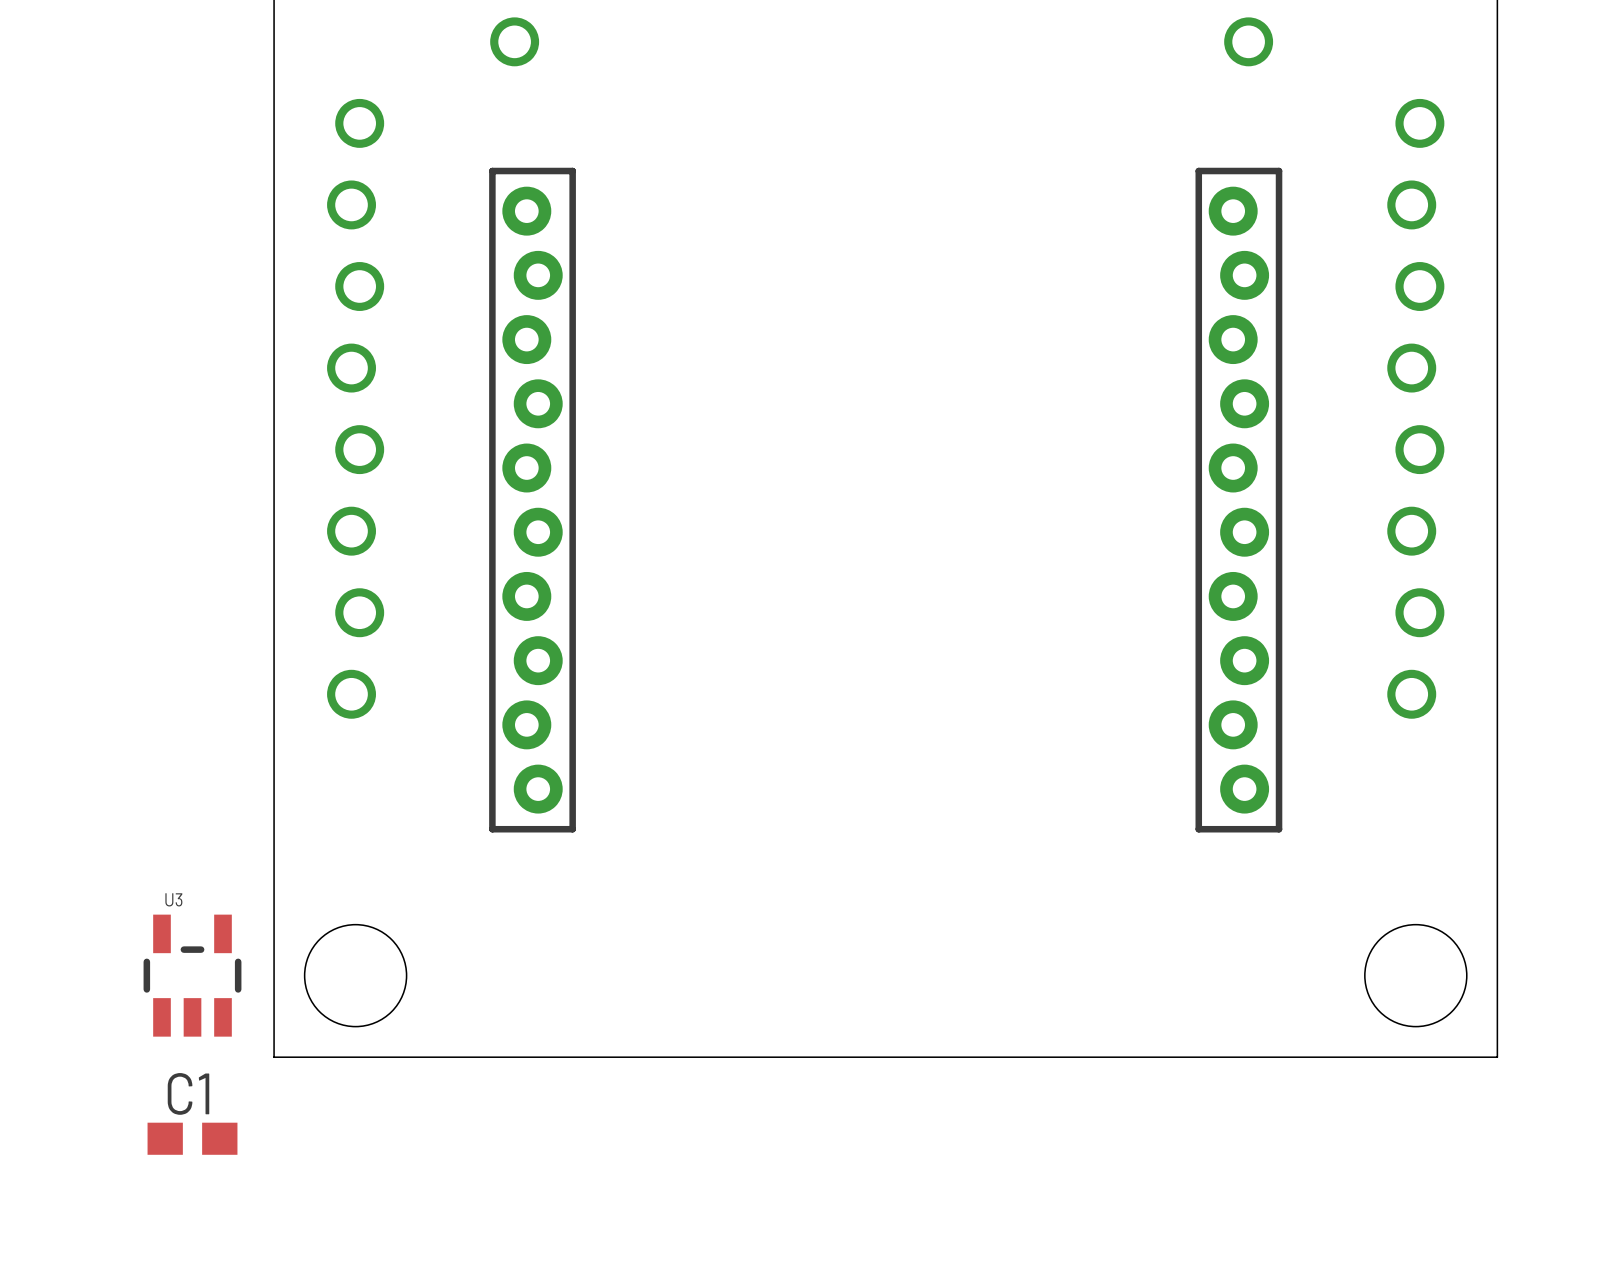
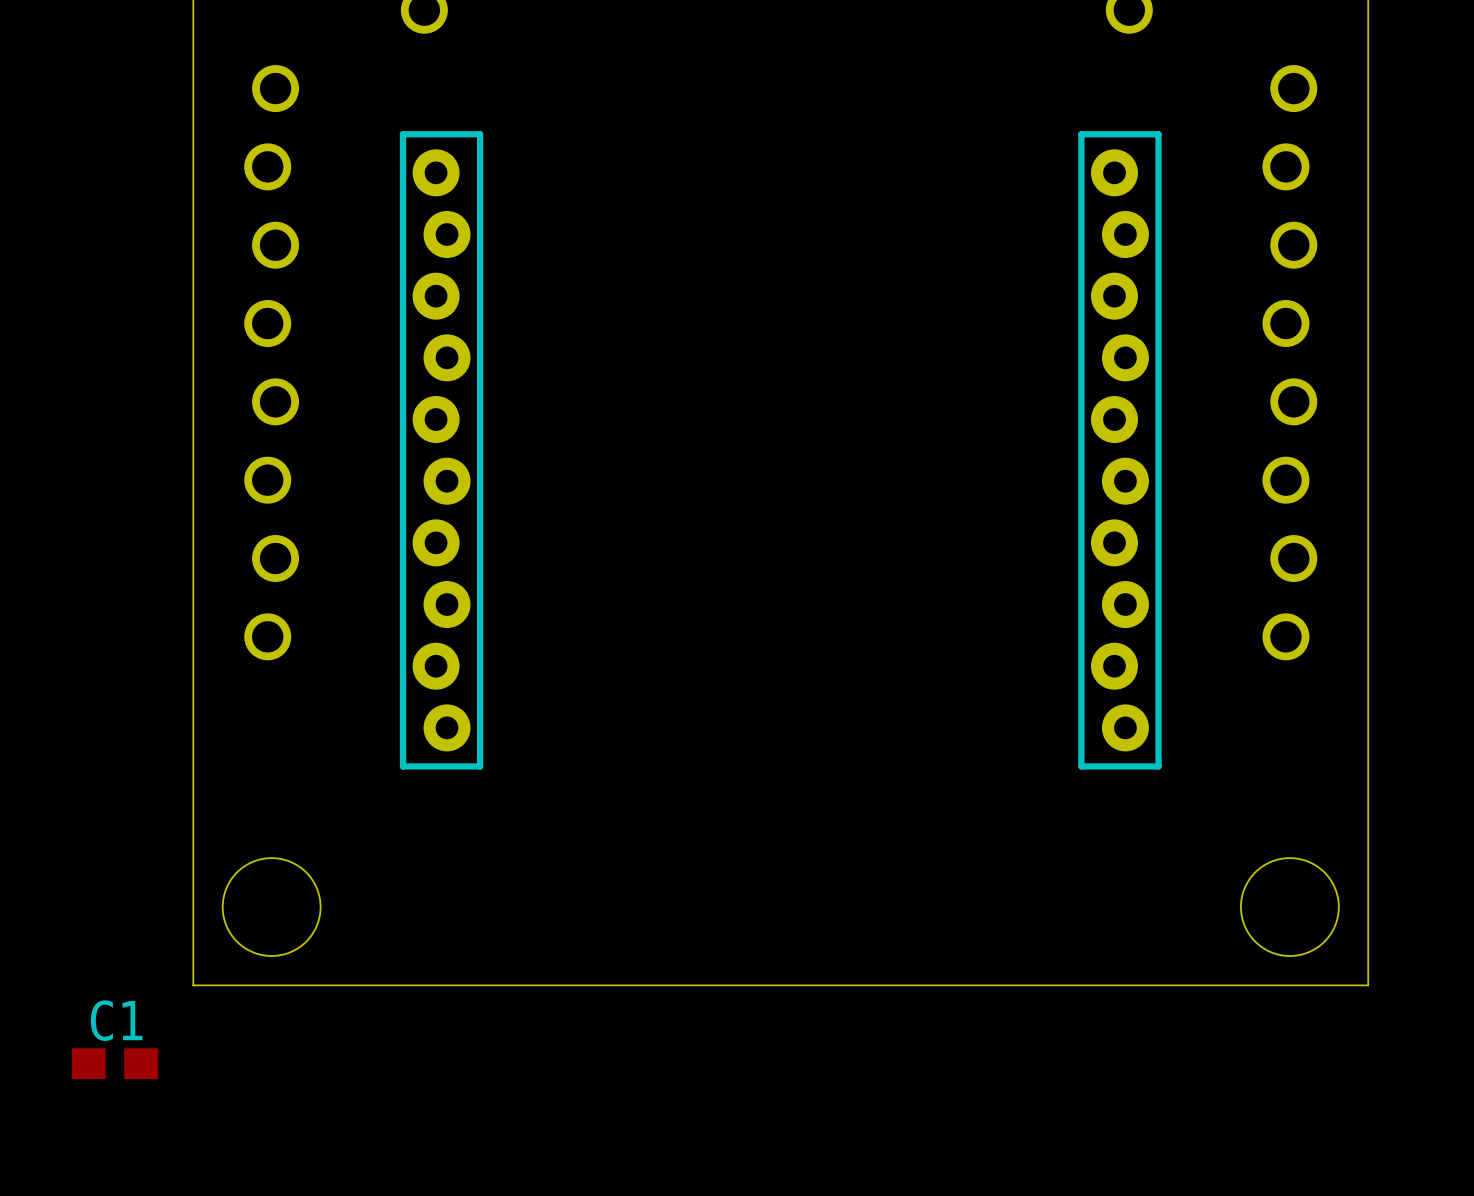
U3: (192, 975) -> none

